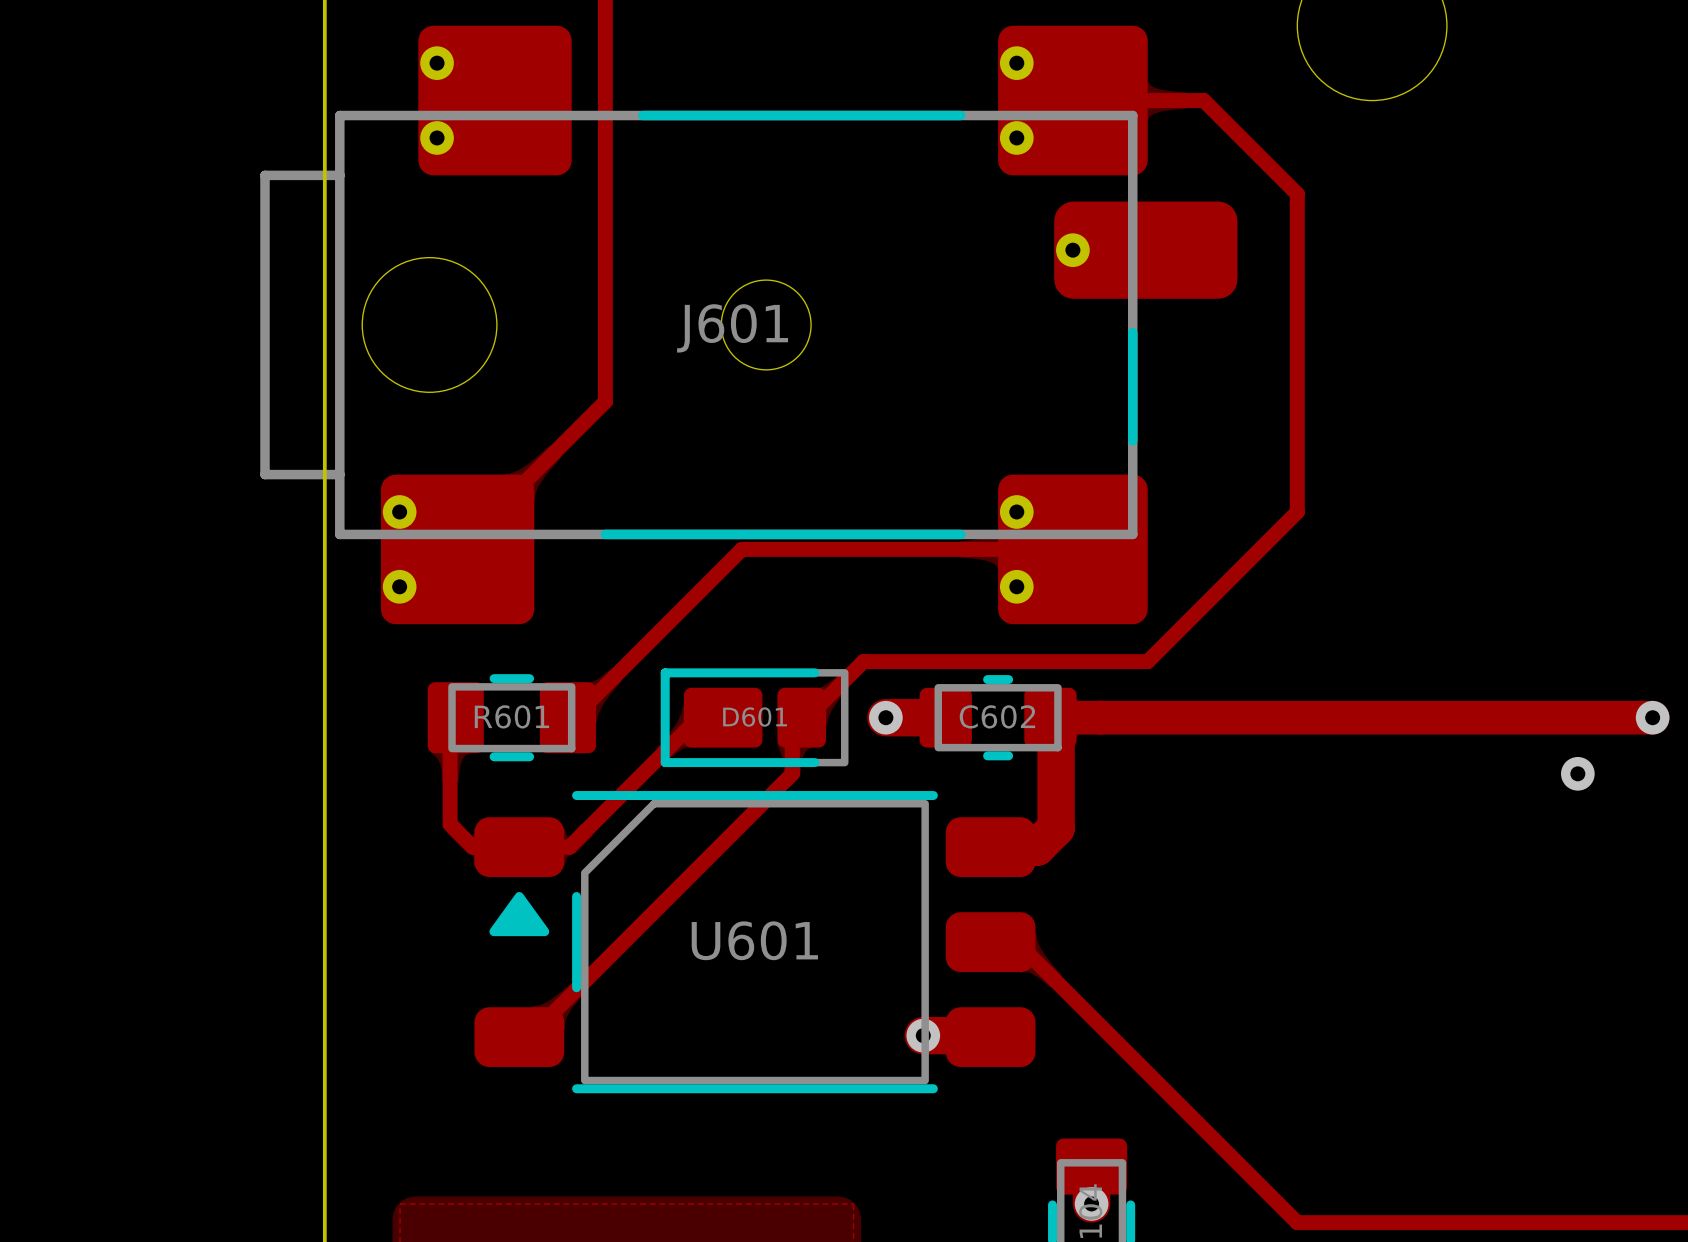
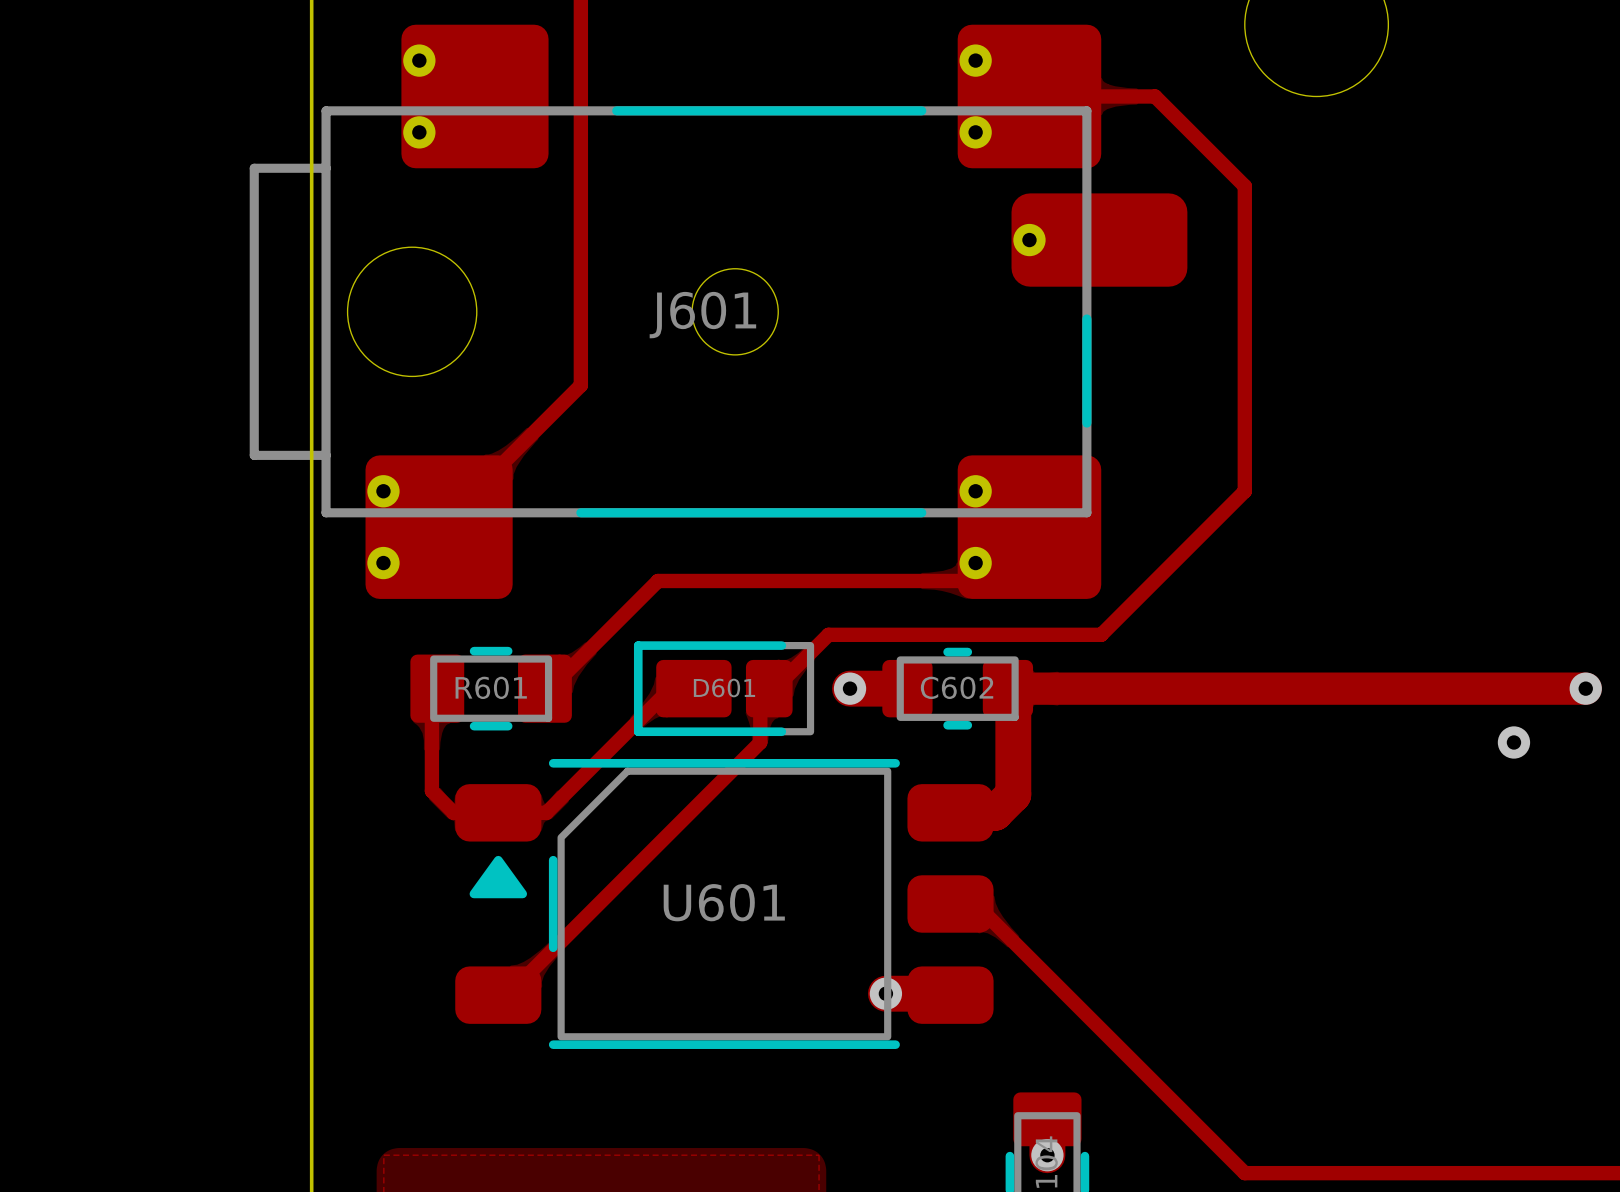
track: (1072, 549) (741, 549) (685, 605) -> (1029, 527) (975, 580) (658, 580)

